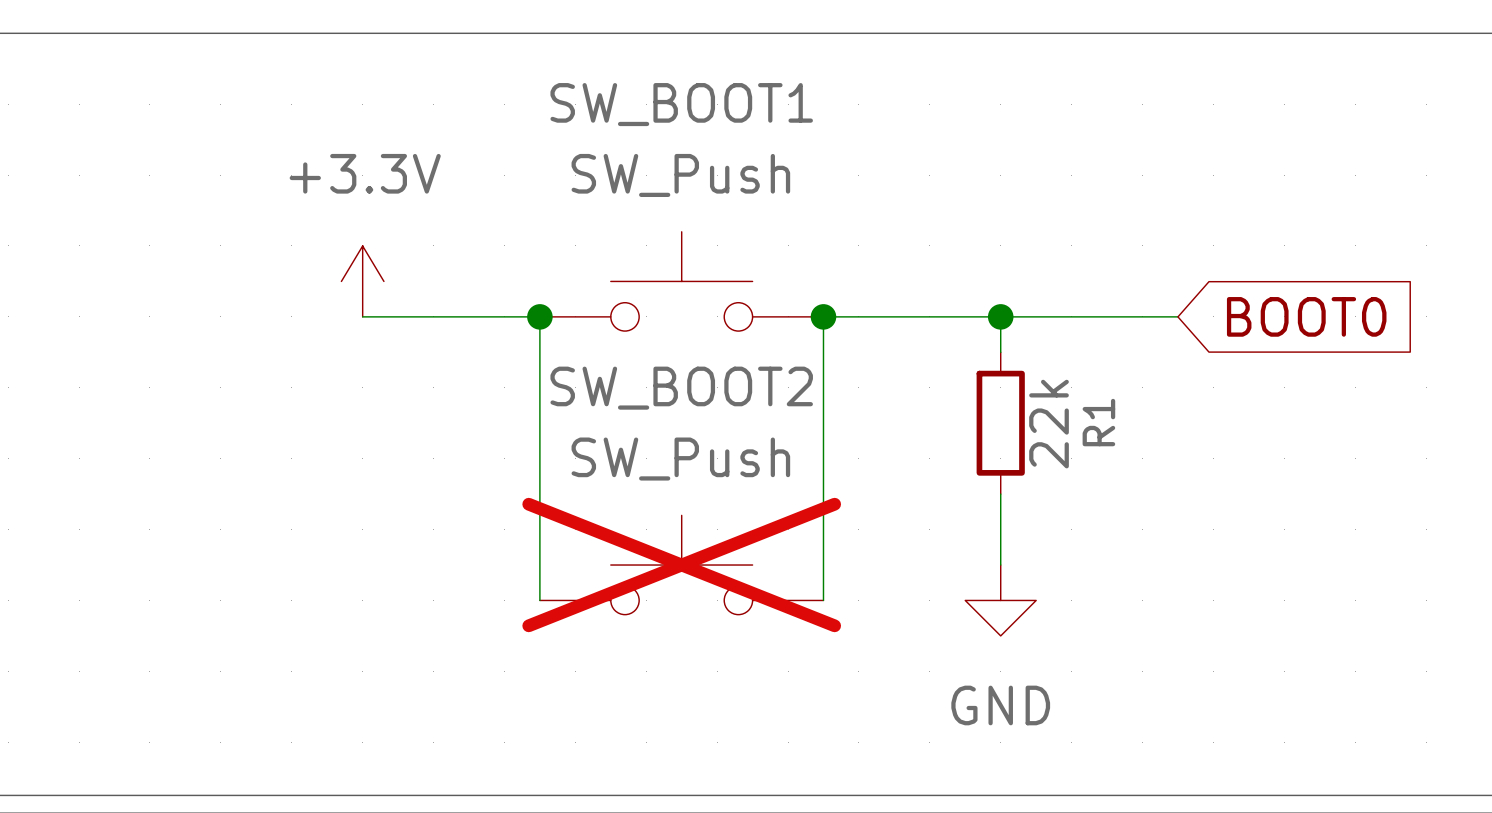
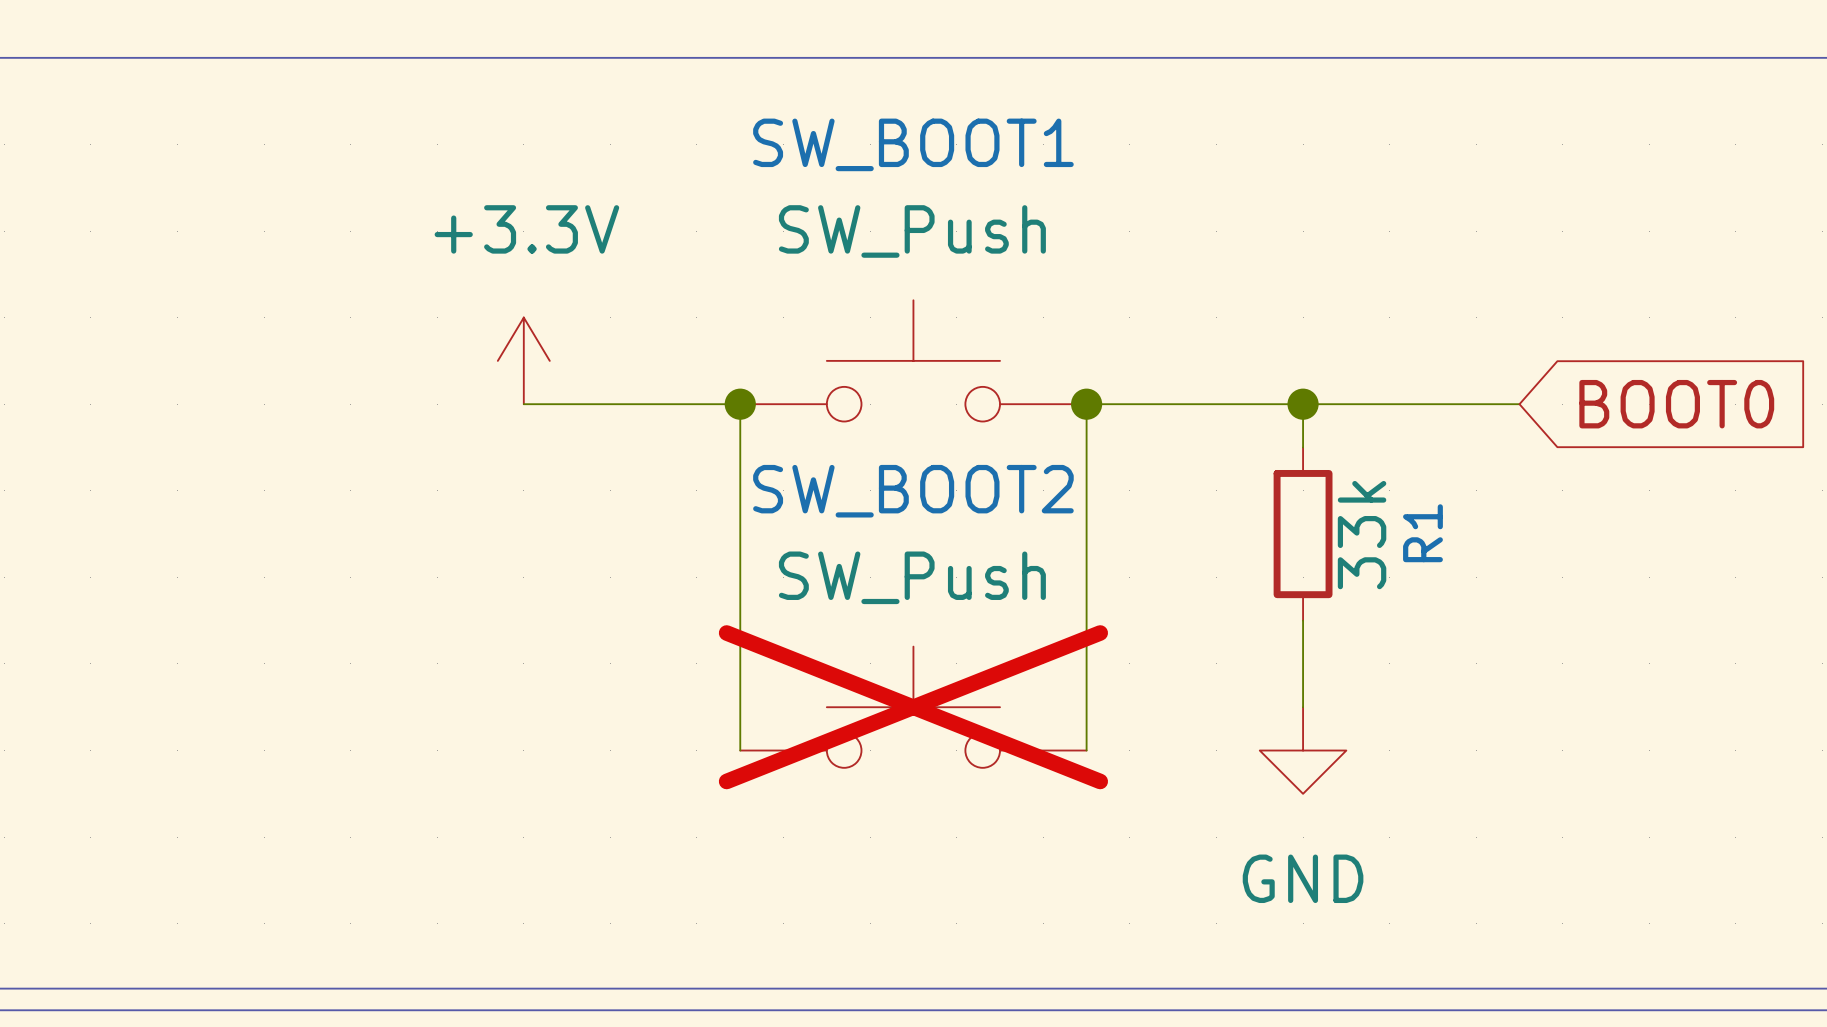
R1 value: 22k (1049, 424) -> 33k (1362, 535)

